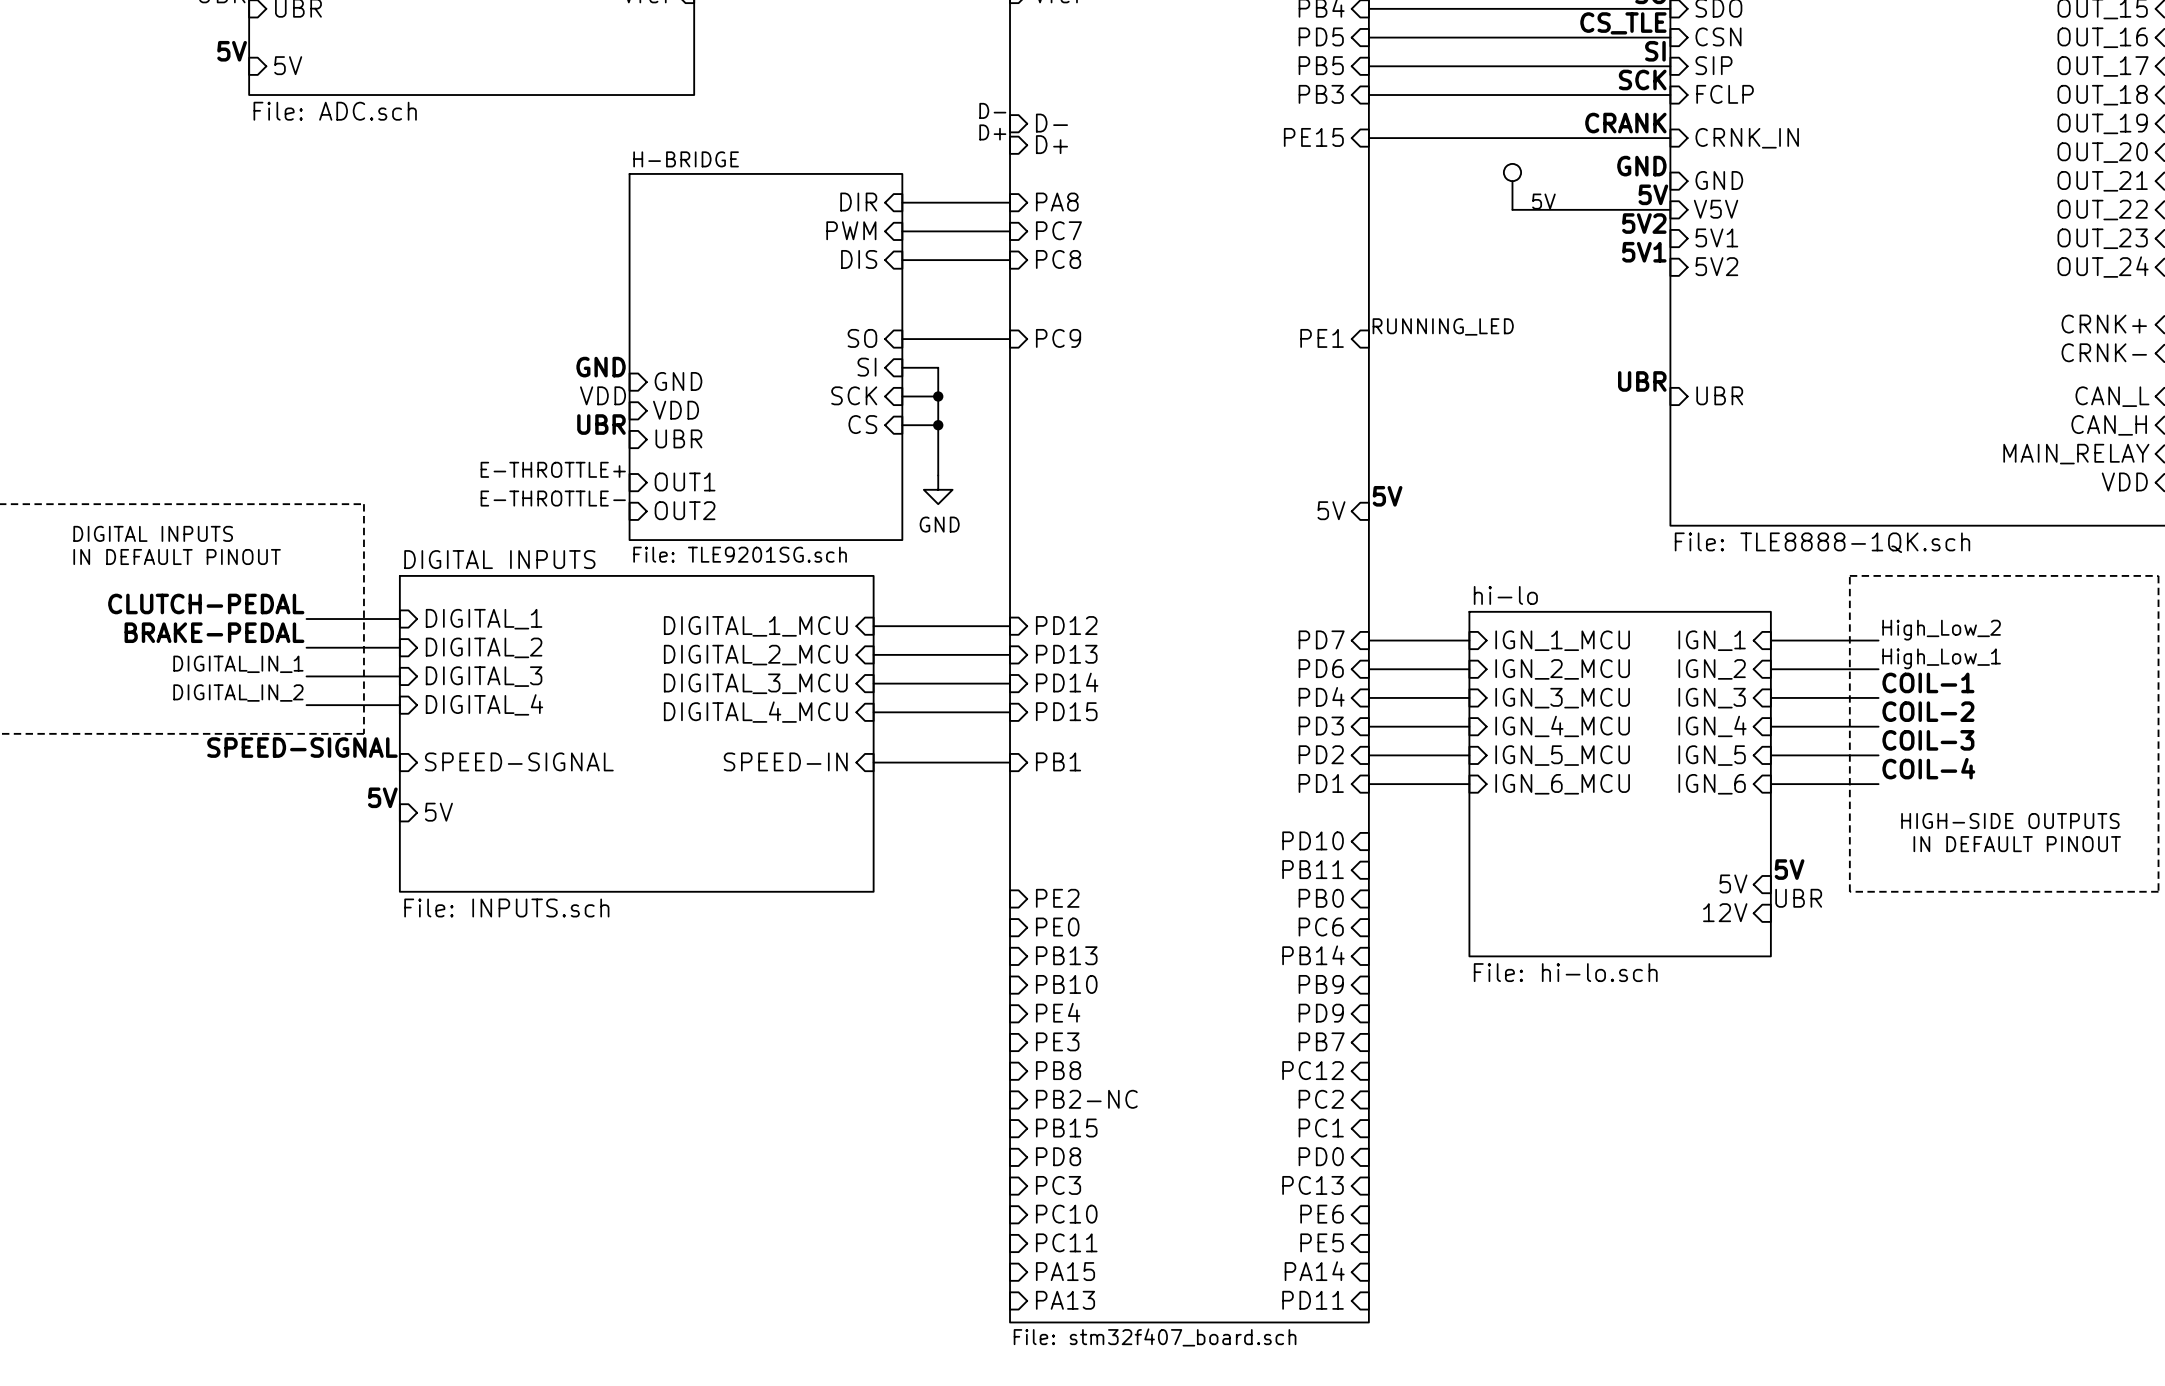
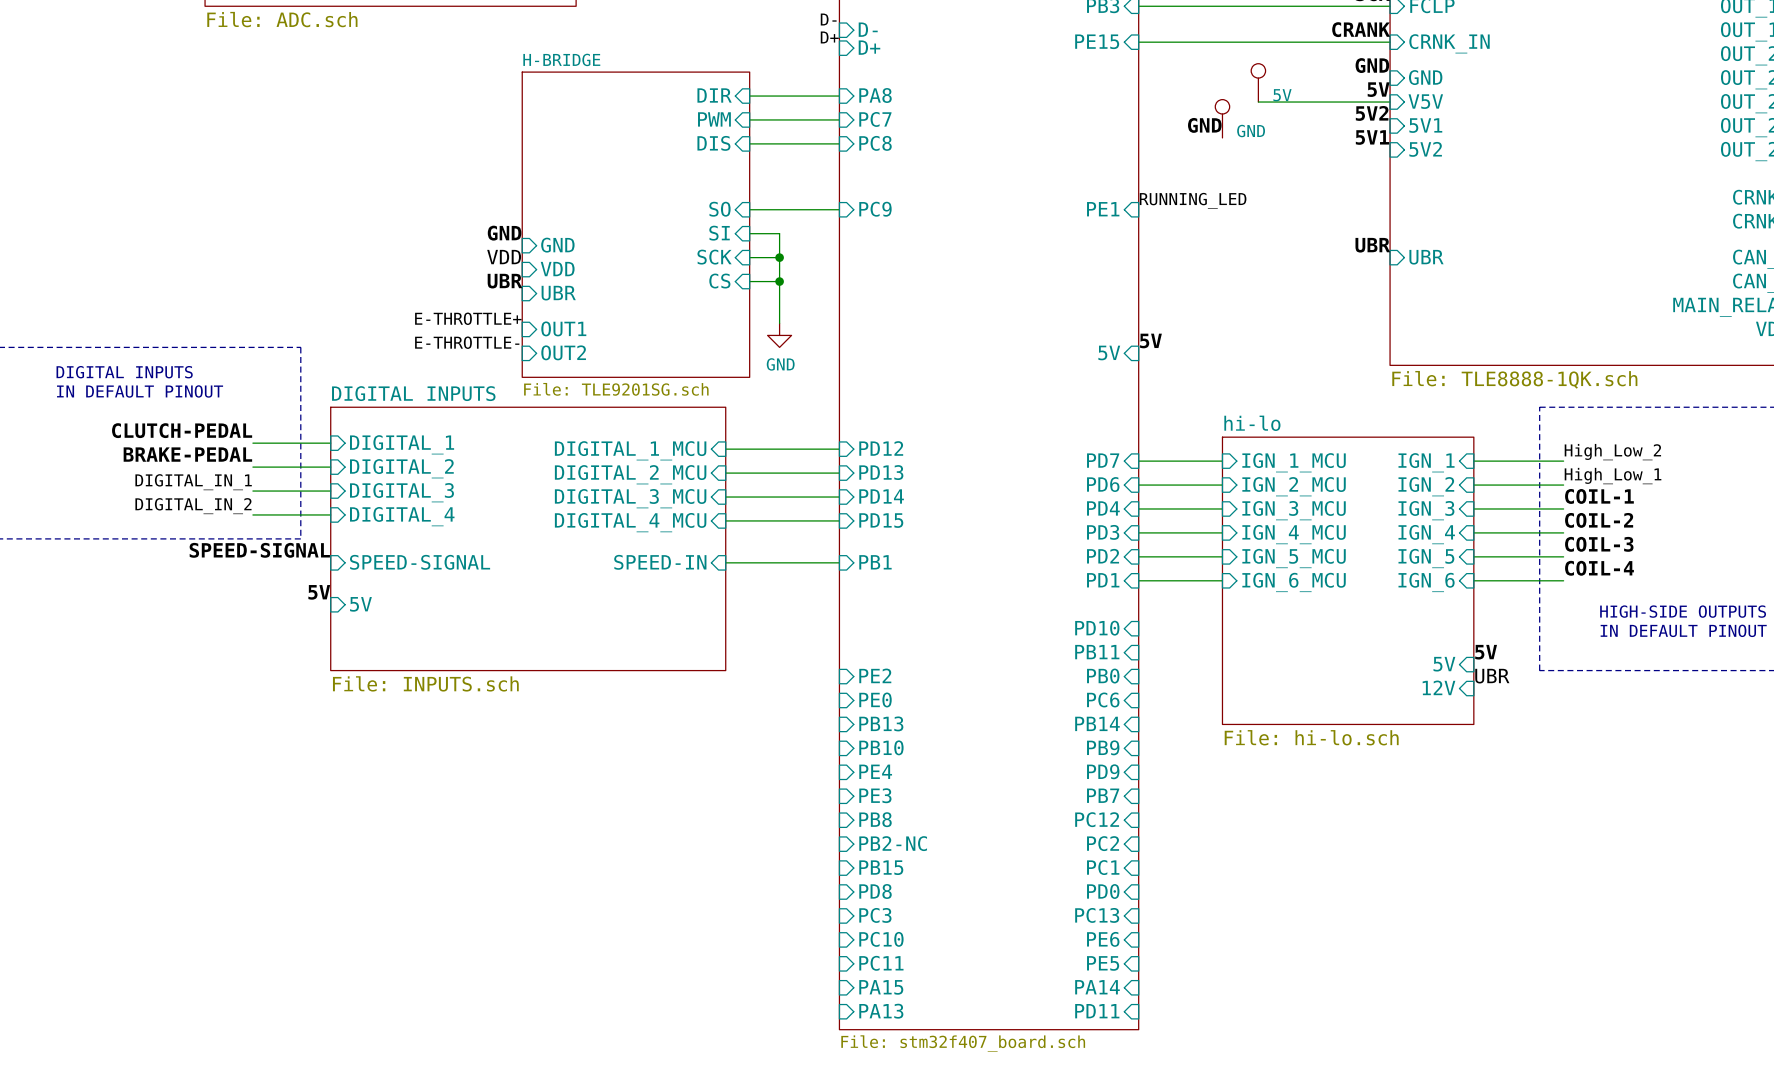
part: none -> GND (1222, 118)
label: none -> GND (1204, 125)

